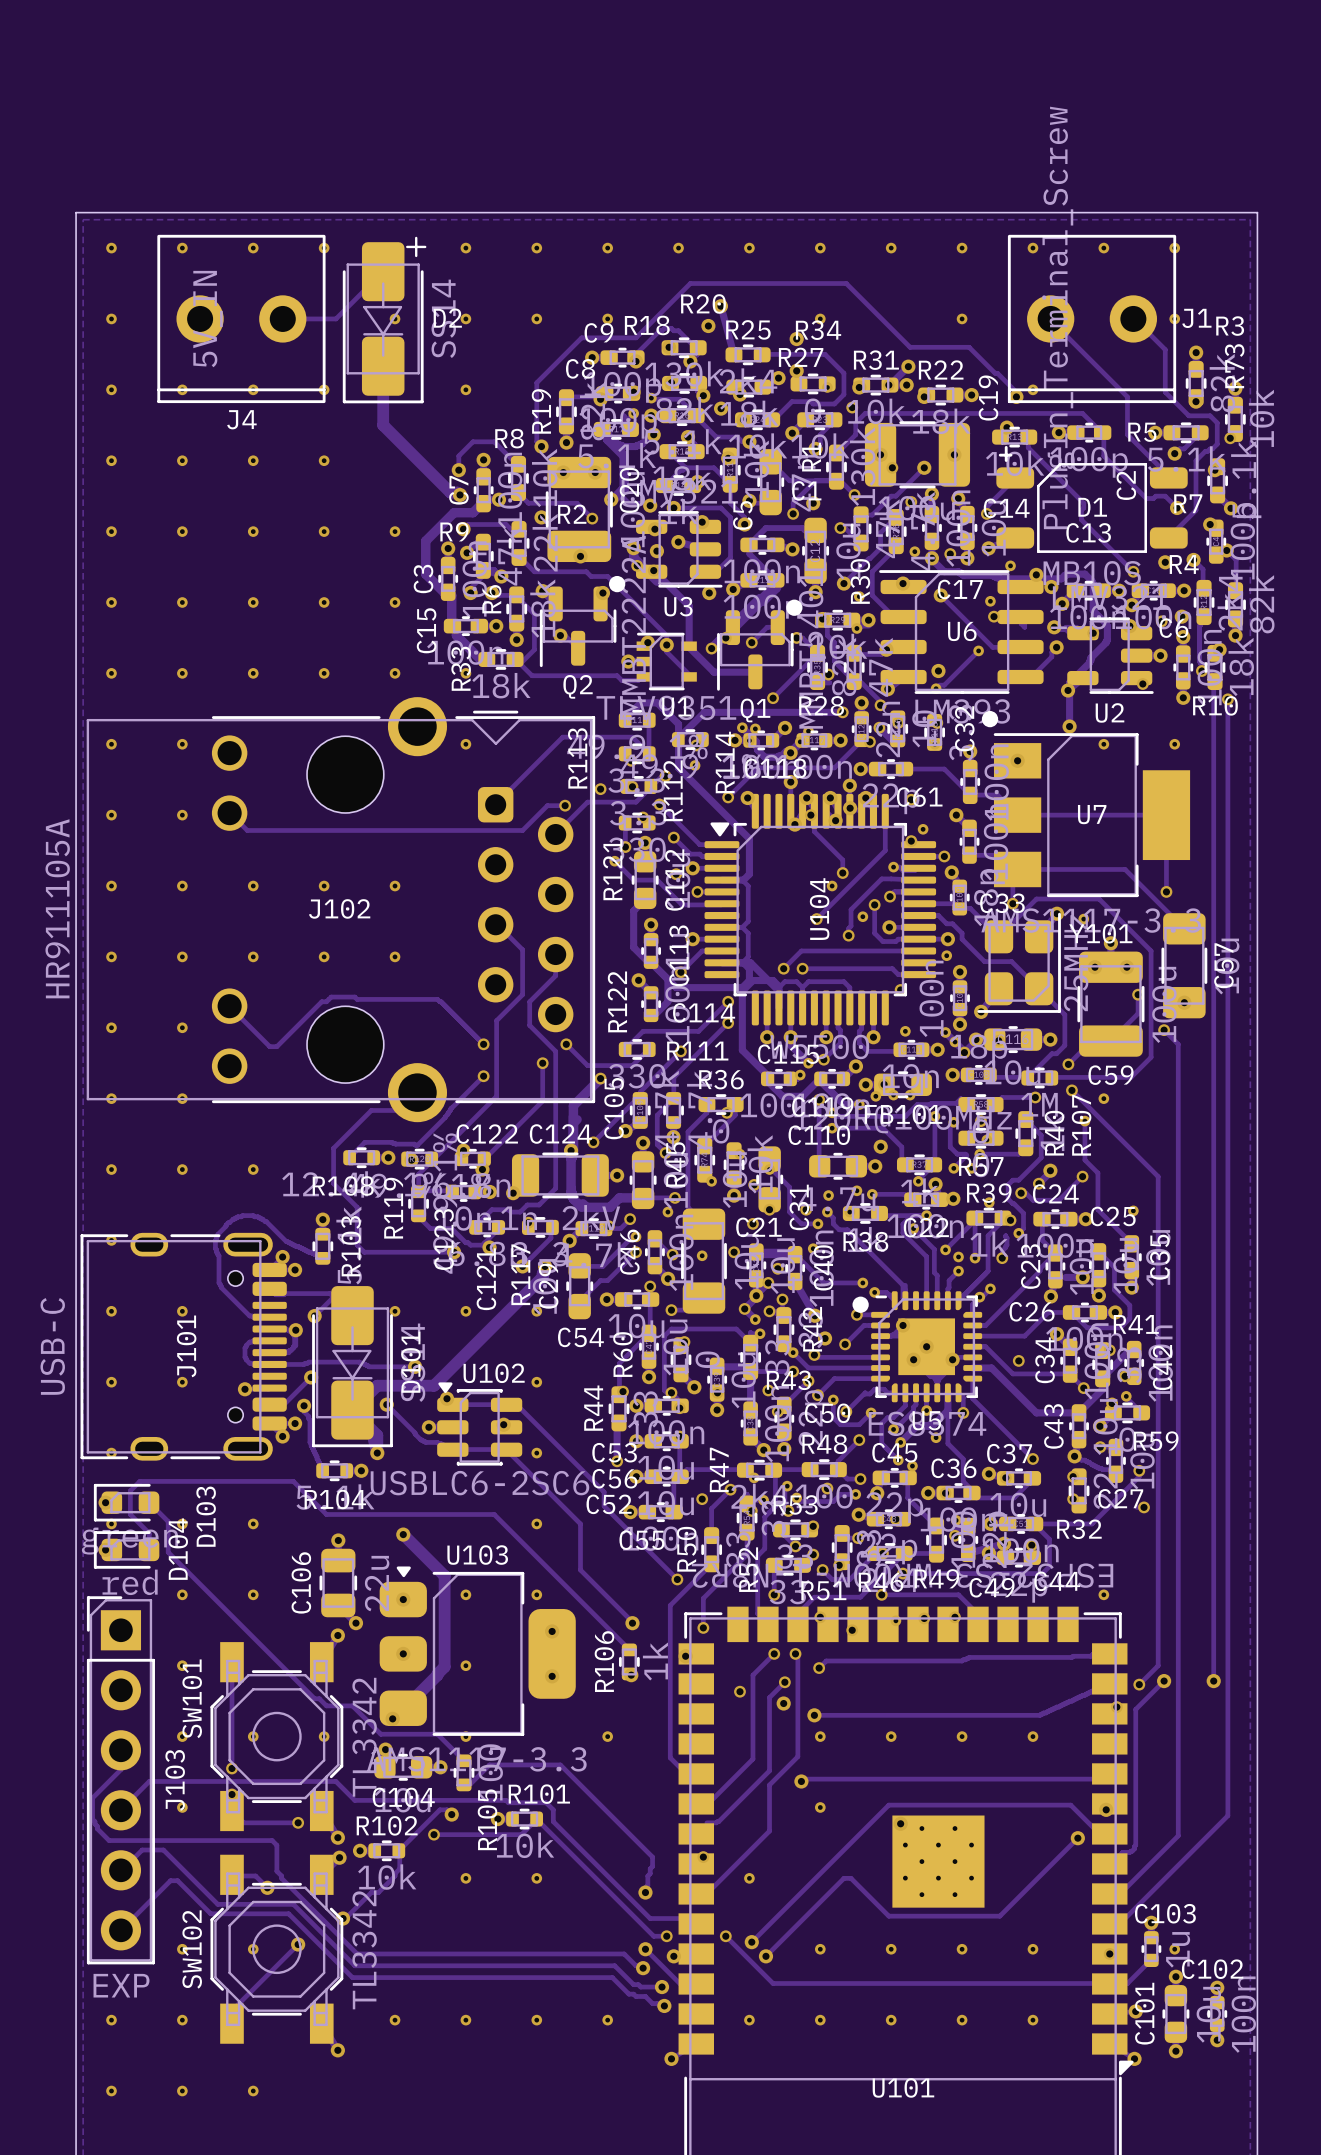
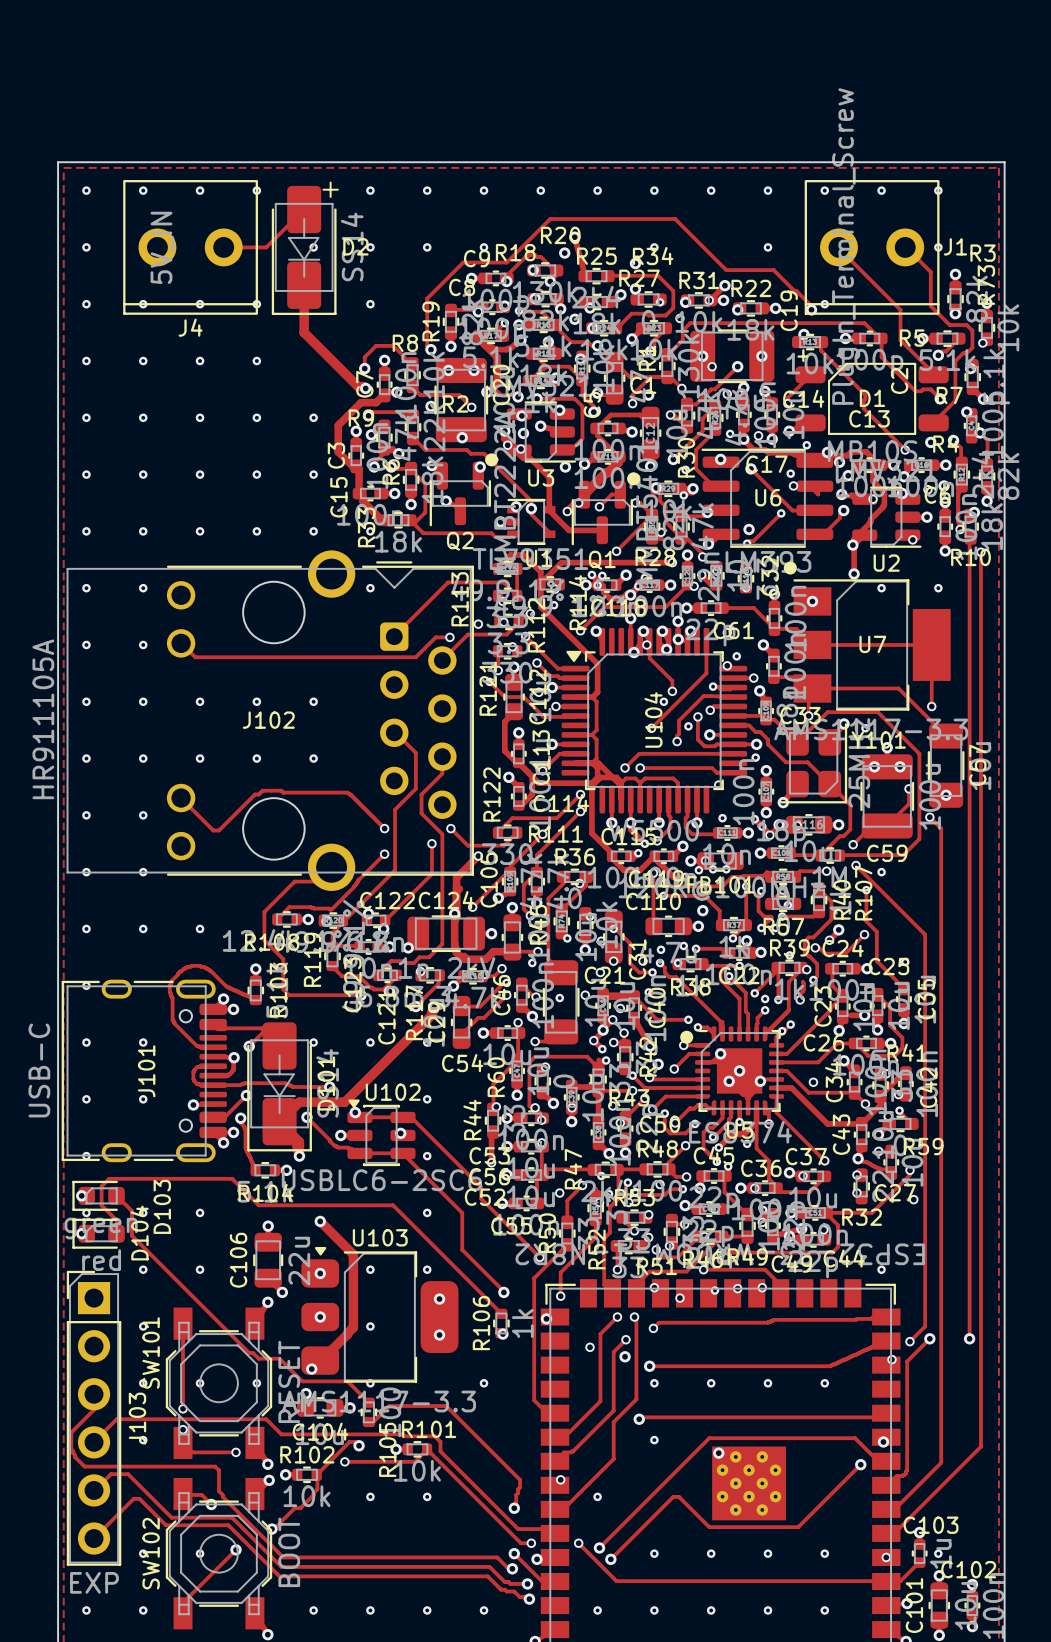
SW101 value: TL3342 (364, 1737) -> RESET (289, 1381)
SW102 value: TL3342 (364, 1949) -> BOOT (289, 1552)

